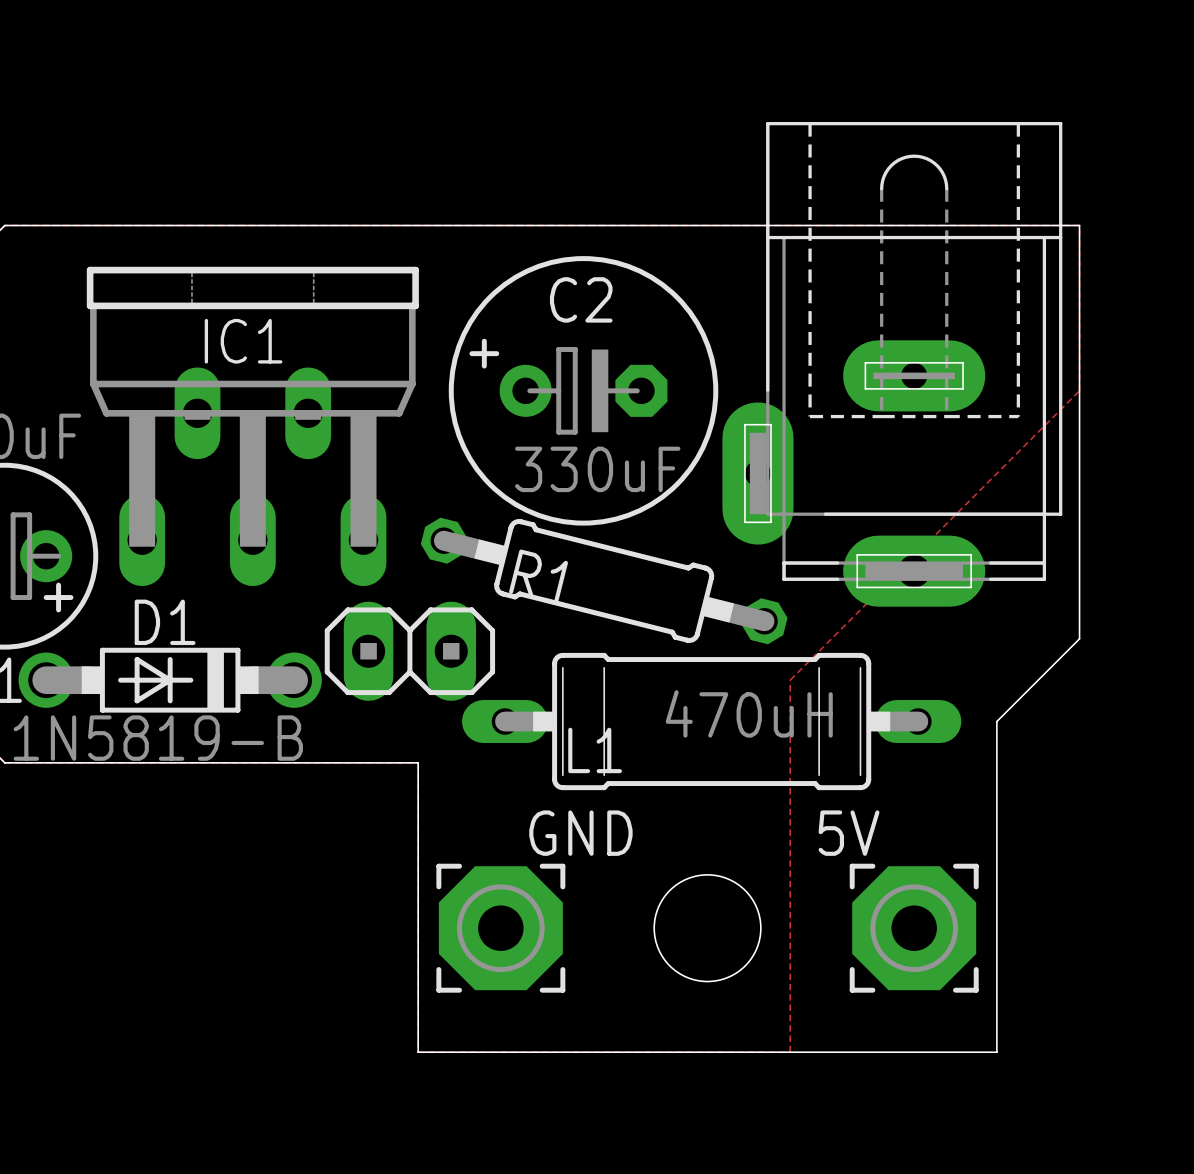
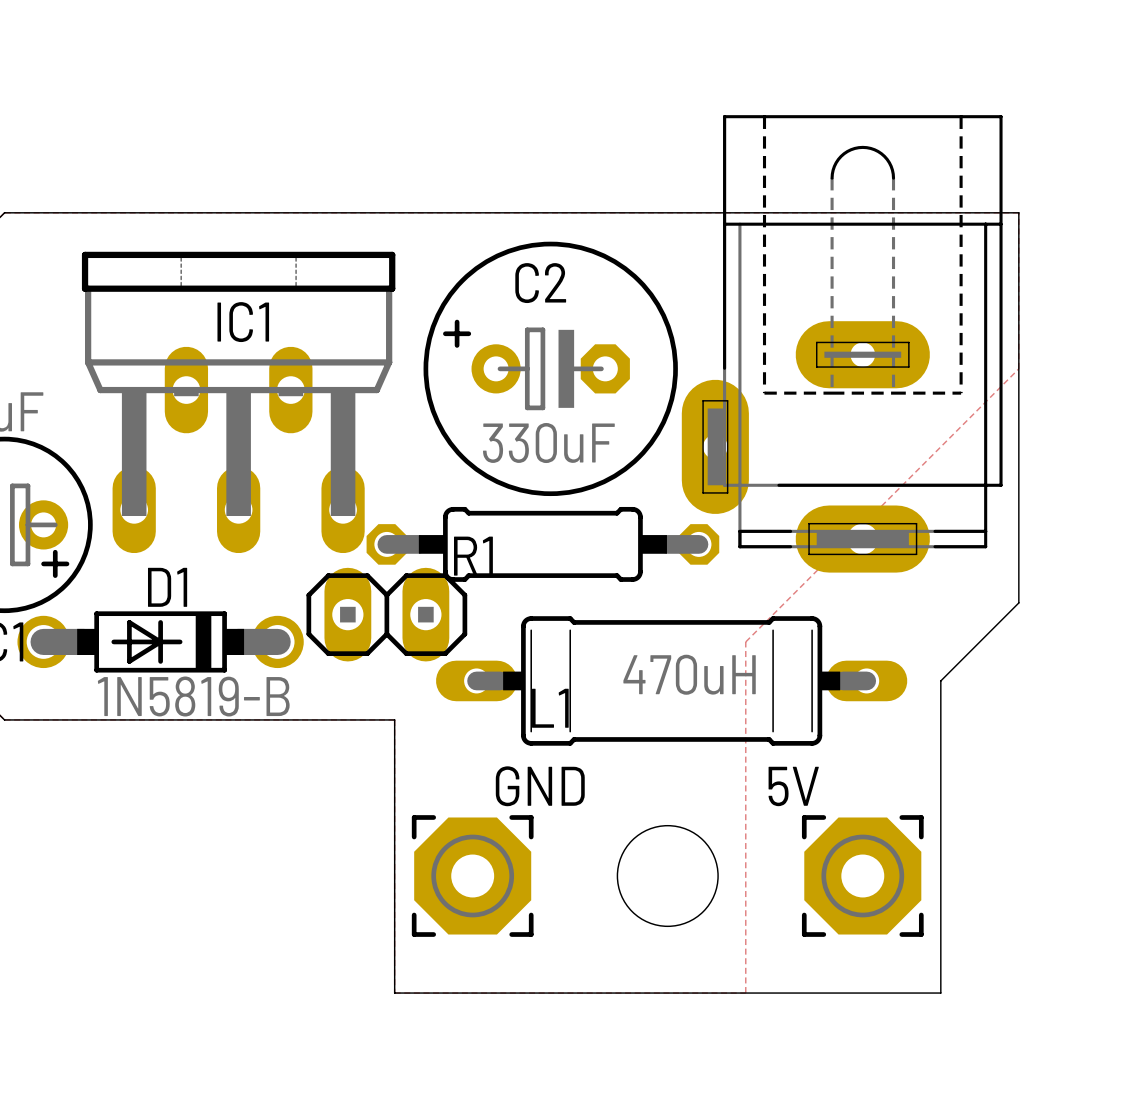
R1 rotation: 0° (604, 580) -> 14.1° counterclockwise (542, 544)

